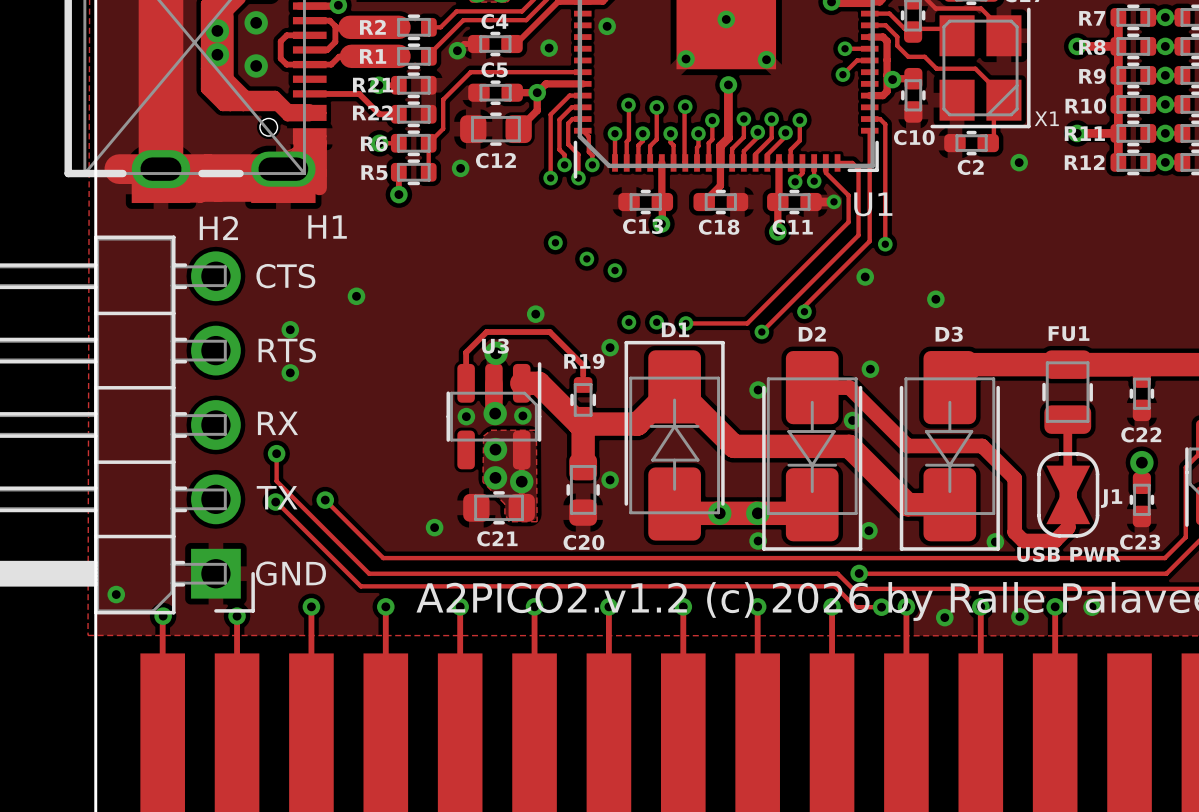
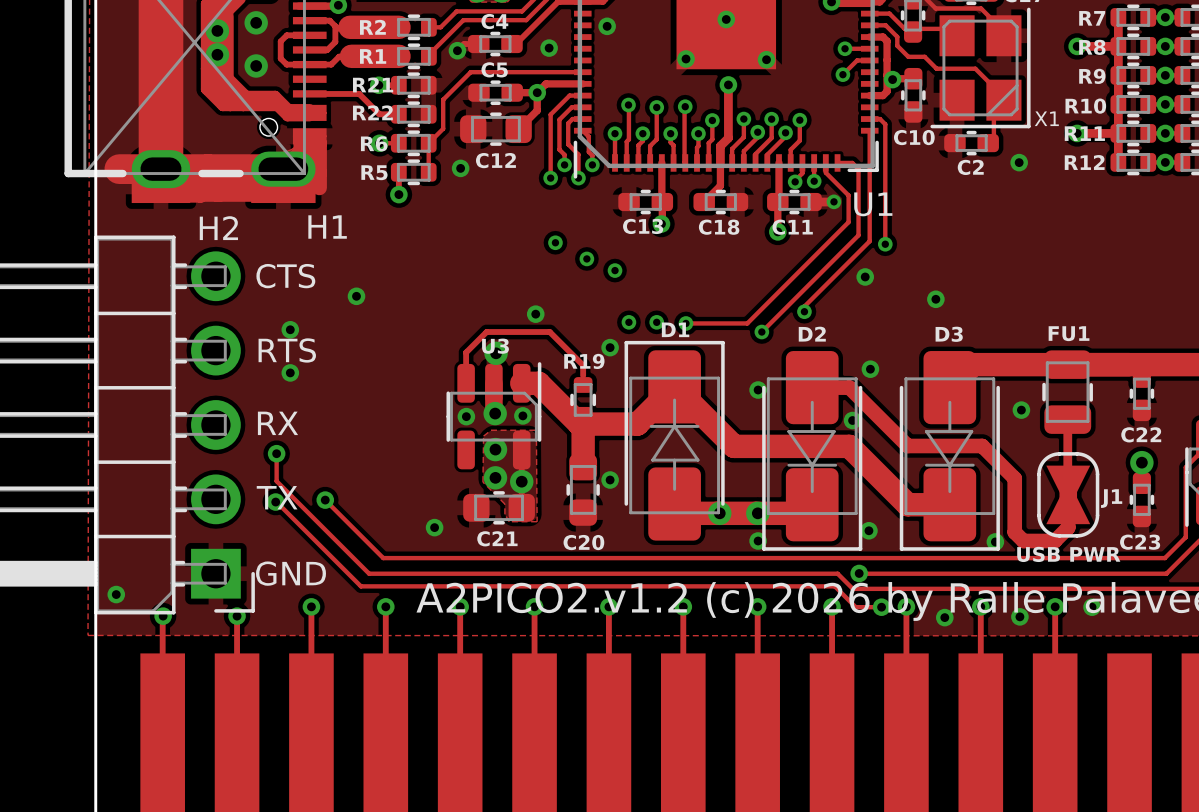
via: none -> (1021, 410)

